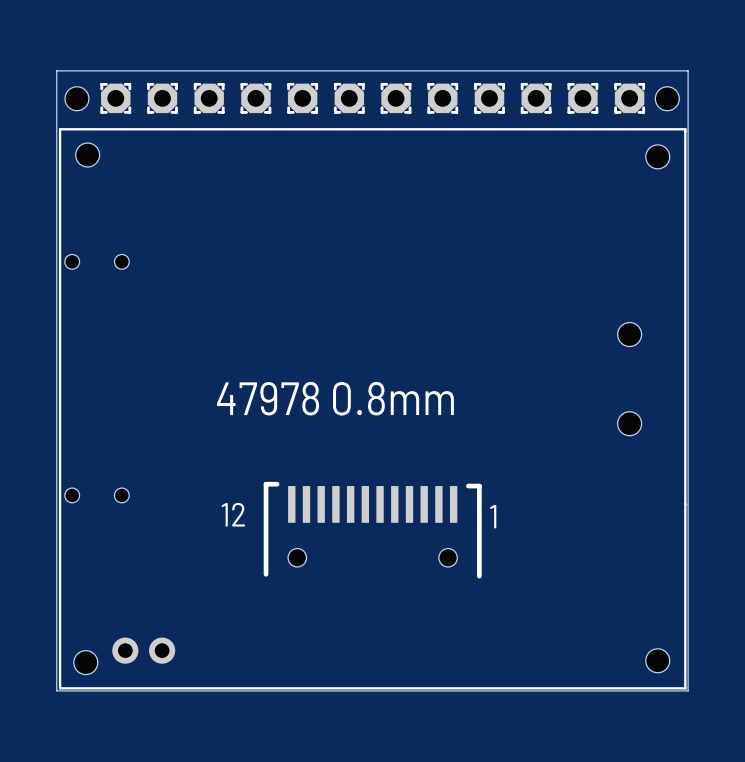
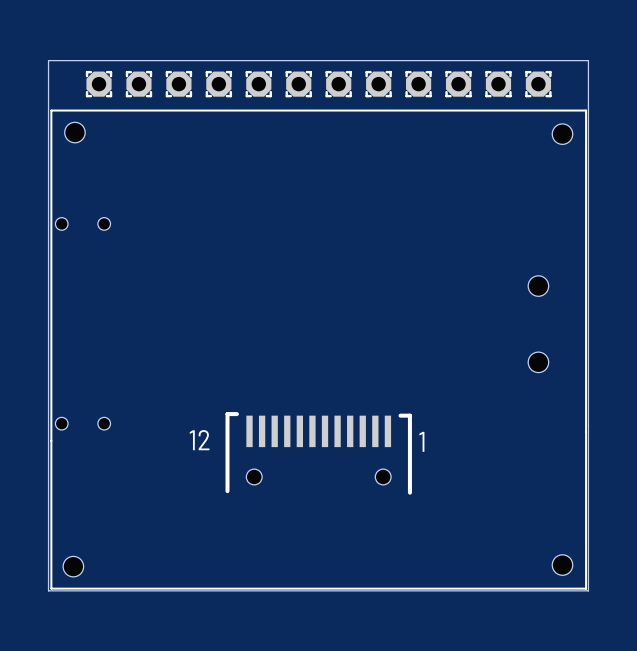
hole: (76, 98) -> none
hole: (667, 98) -> none
text: 47978 0.8mm (335, 398) -> none
part: (143, 650) -> none

